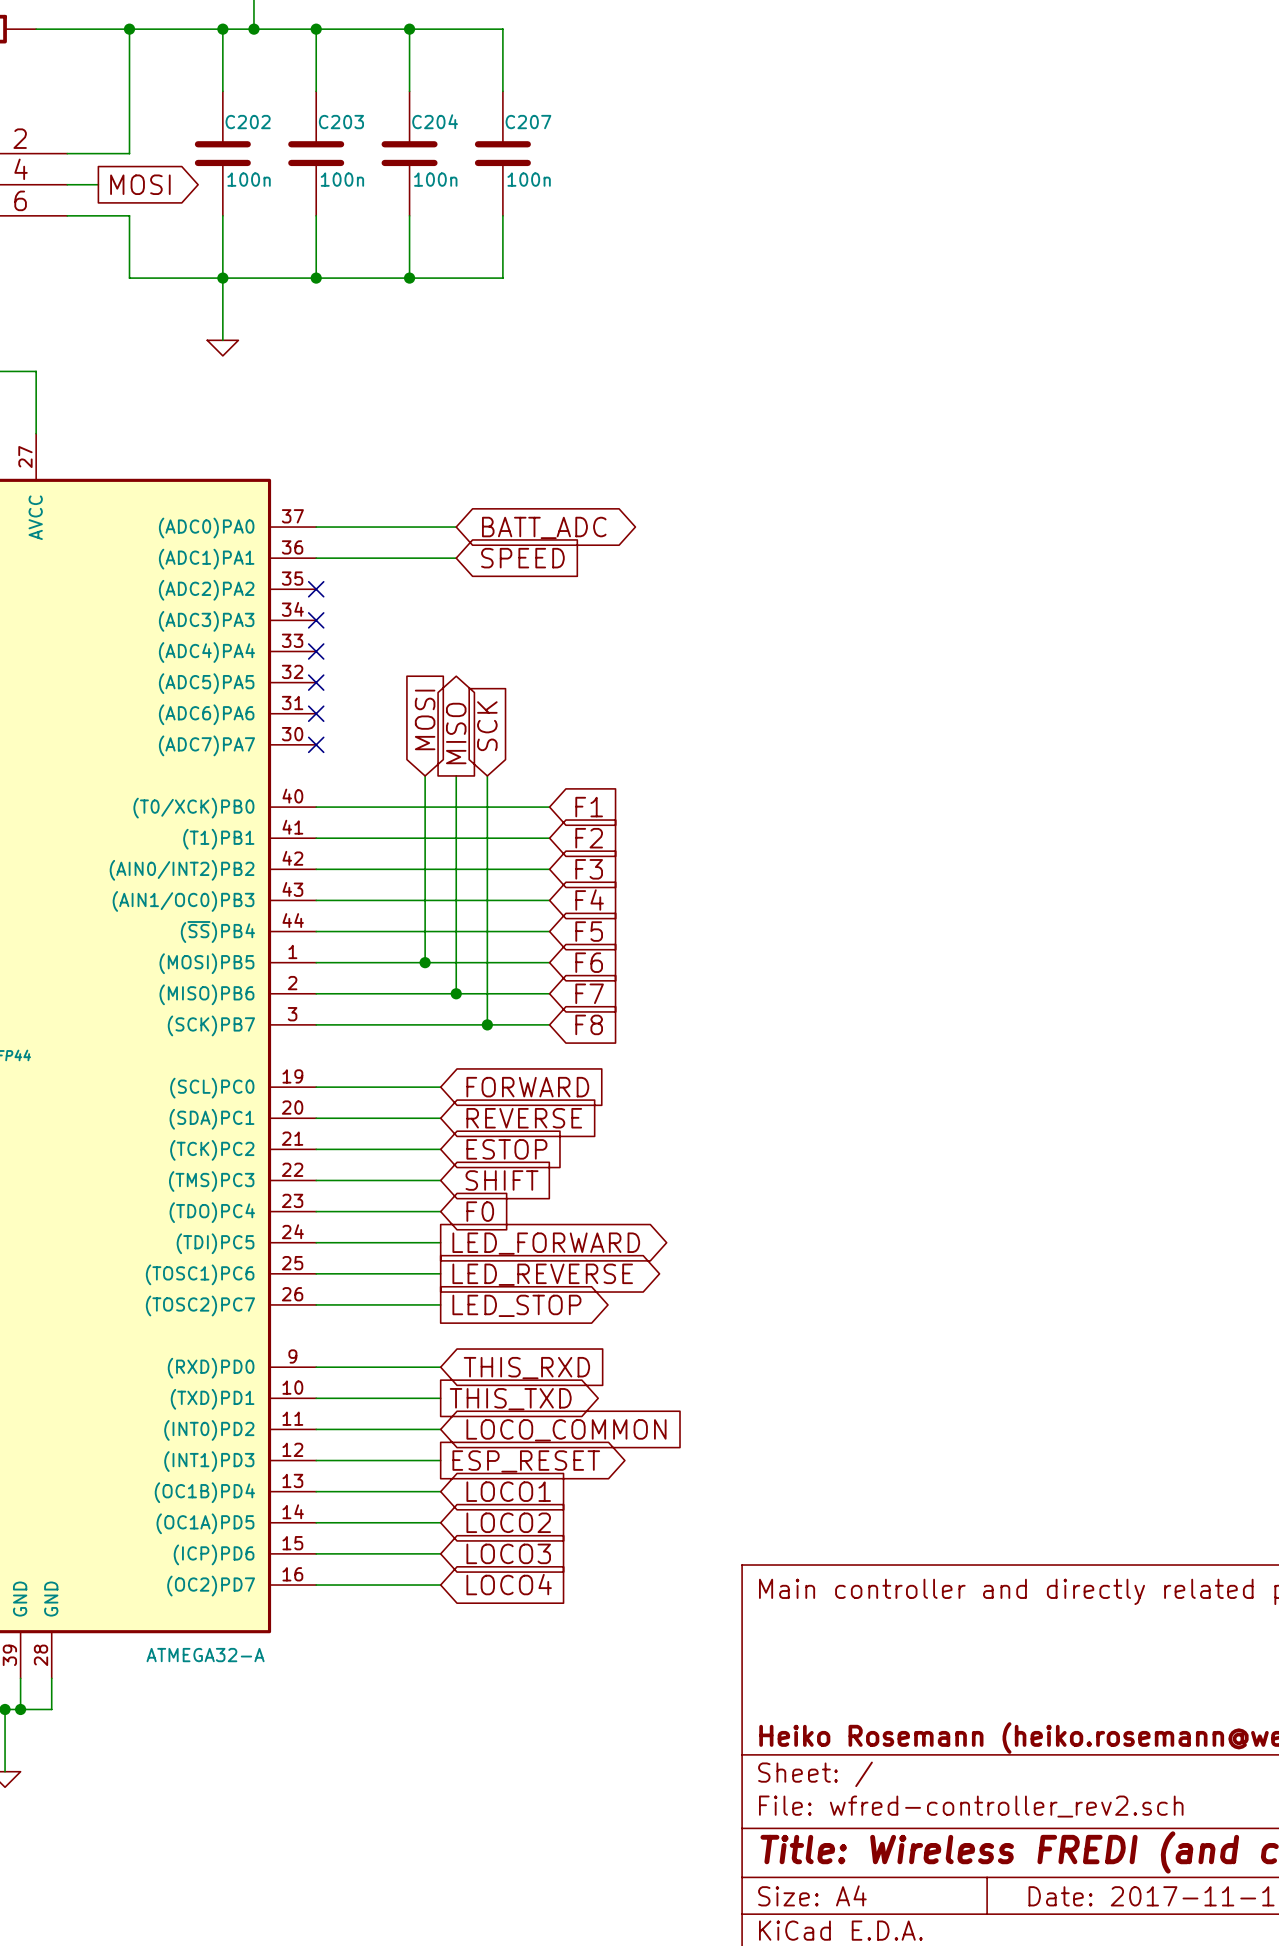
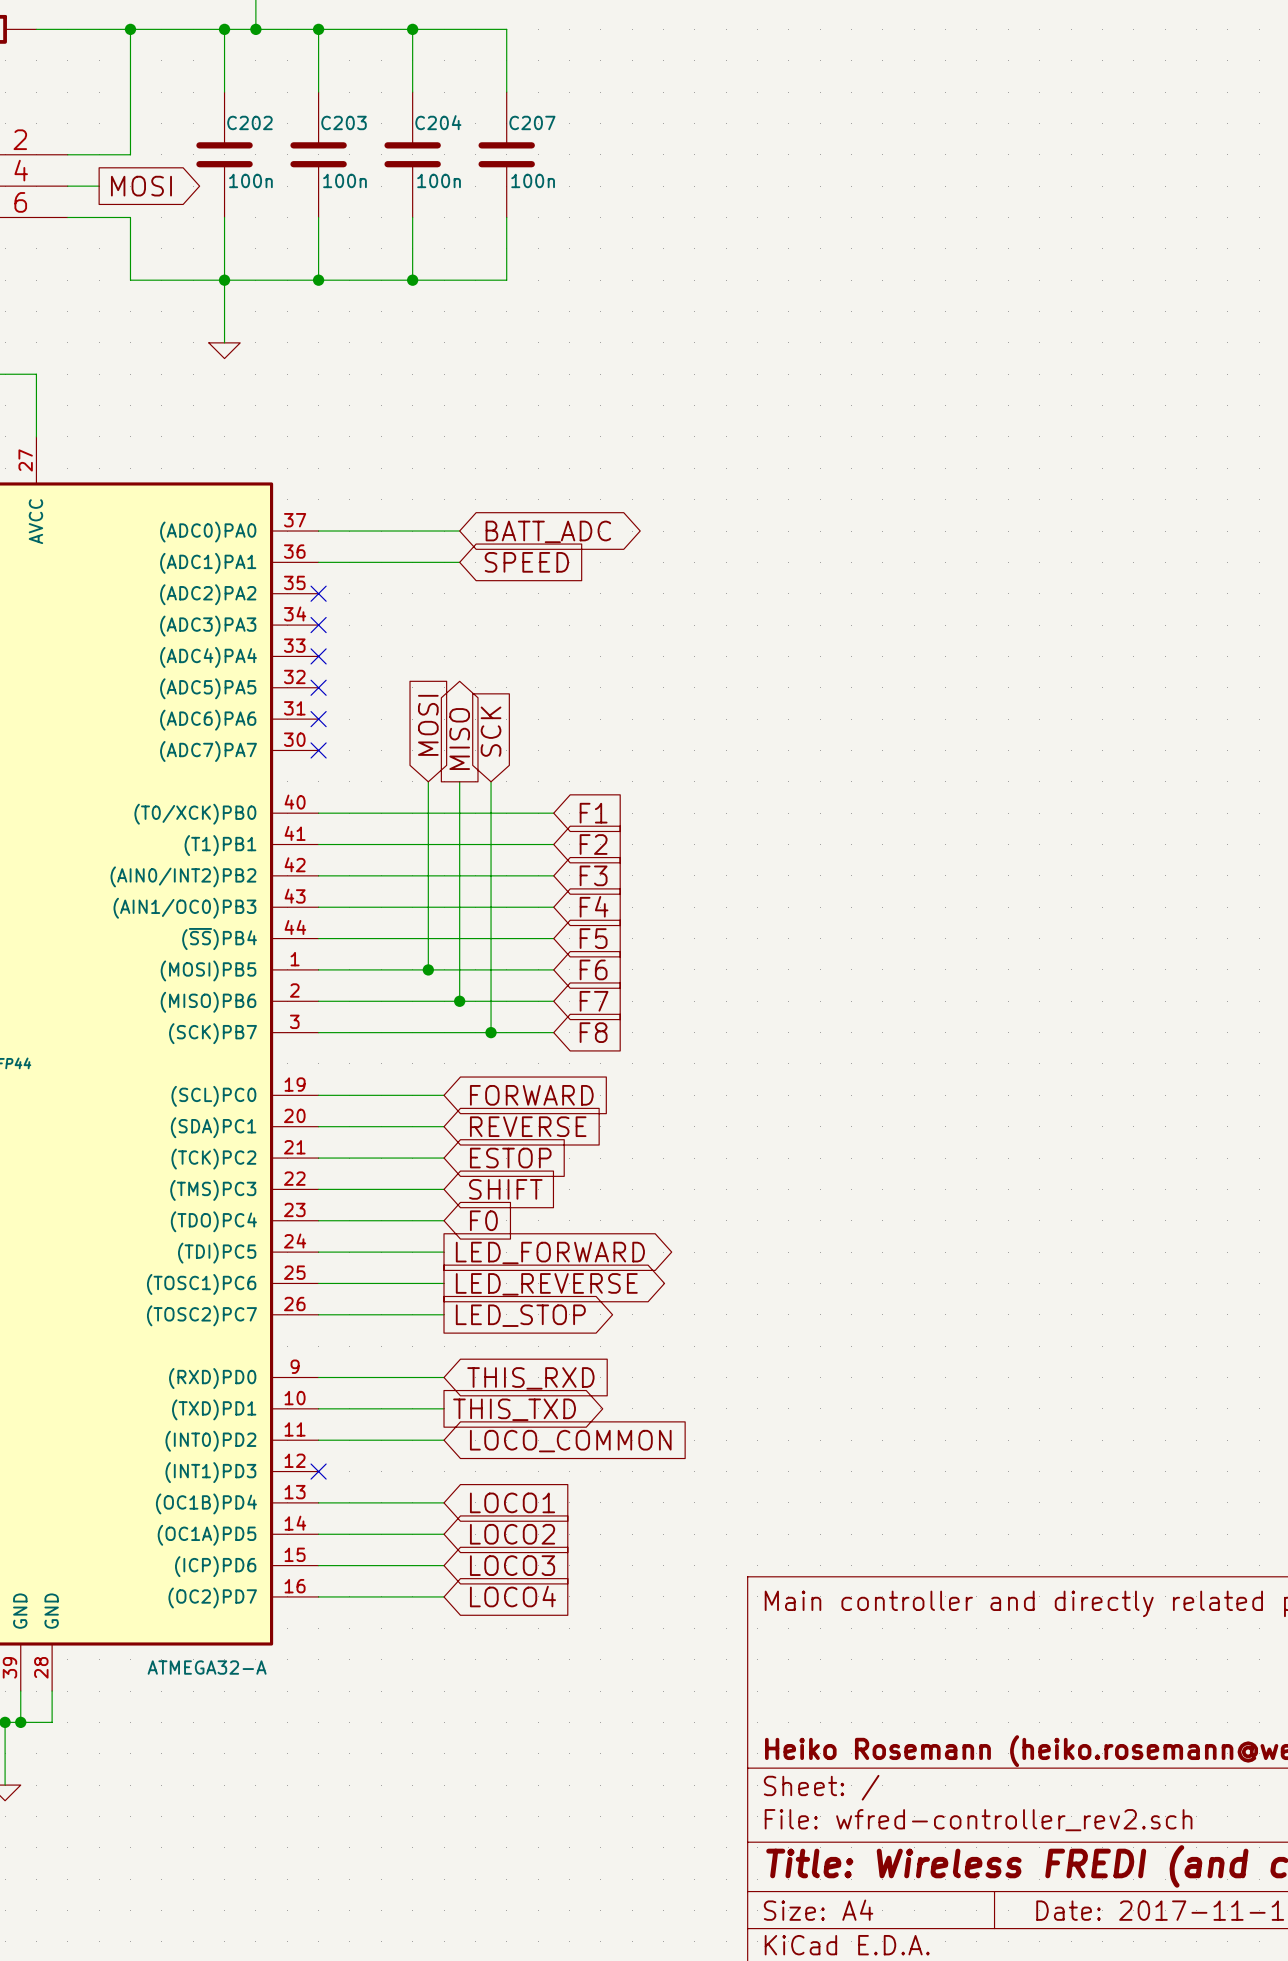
wire: (316, 1460) (440, 1460) -> none
no-connect mark: none -> (318, 1471)
global label: ESP_RESET (526, 1461) -> none

